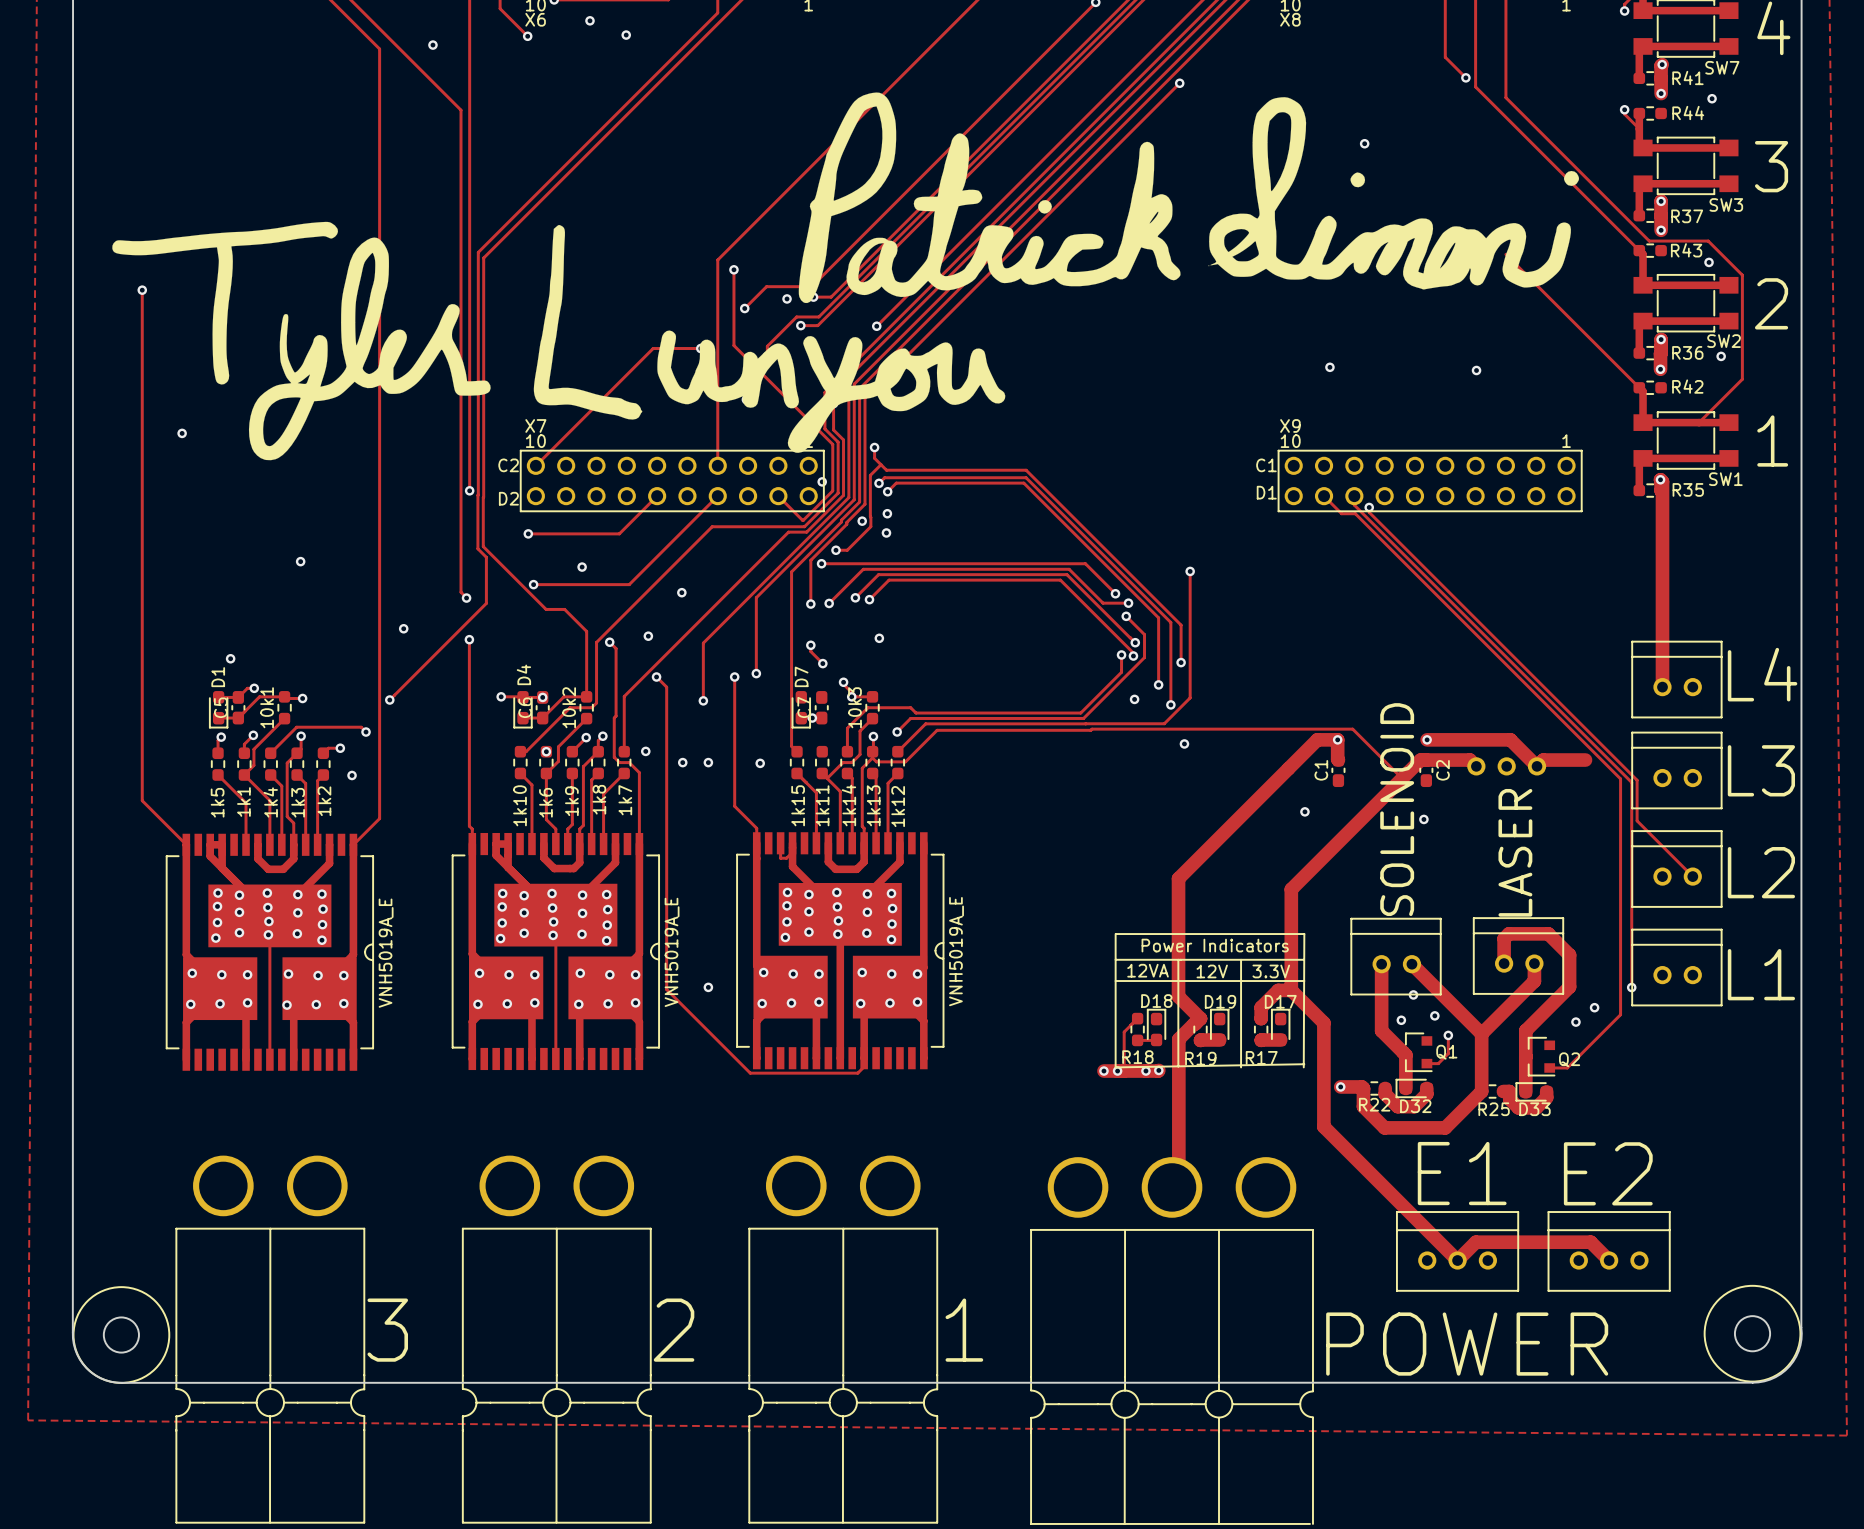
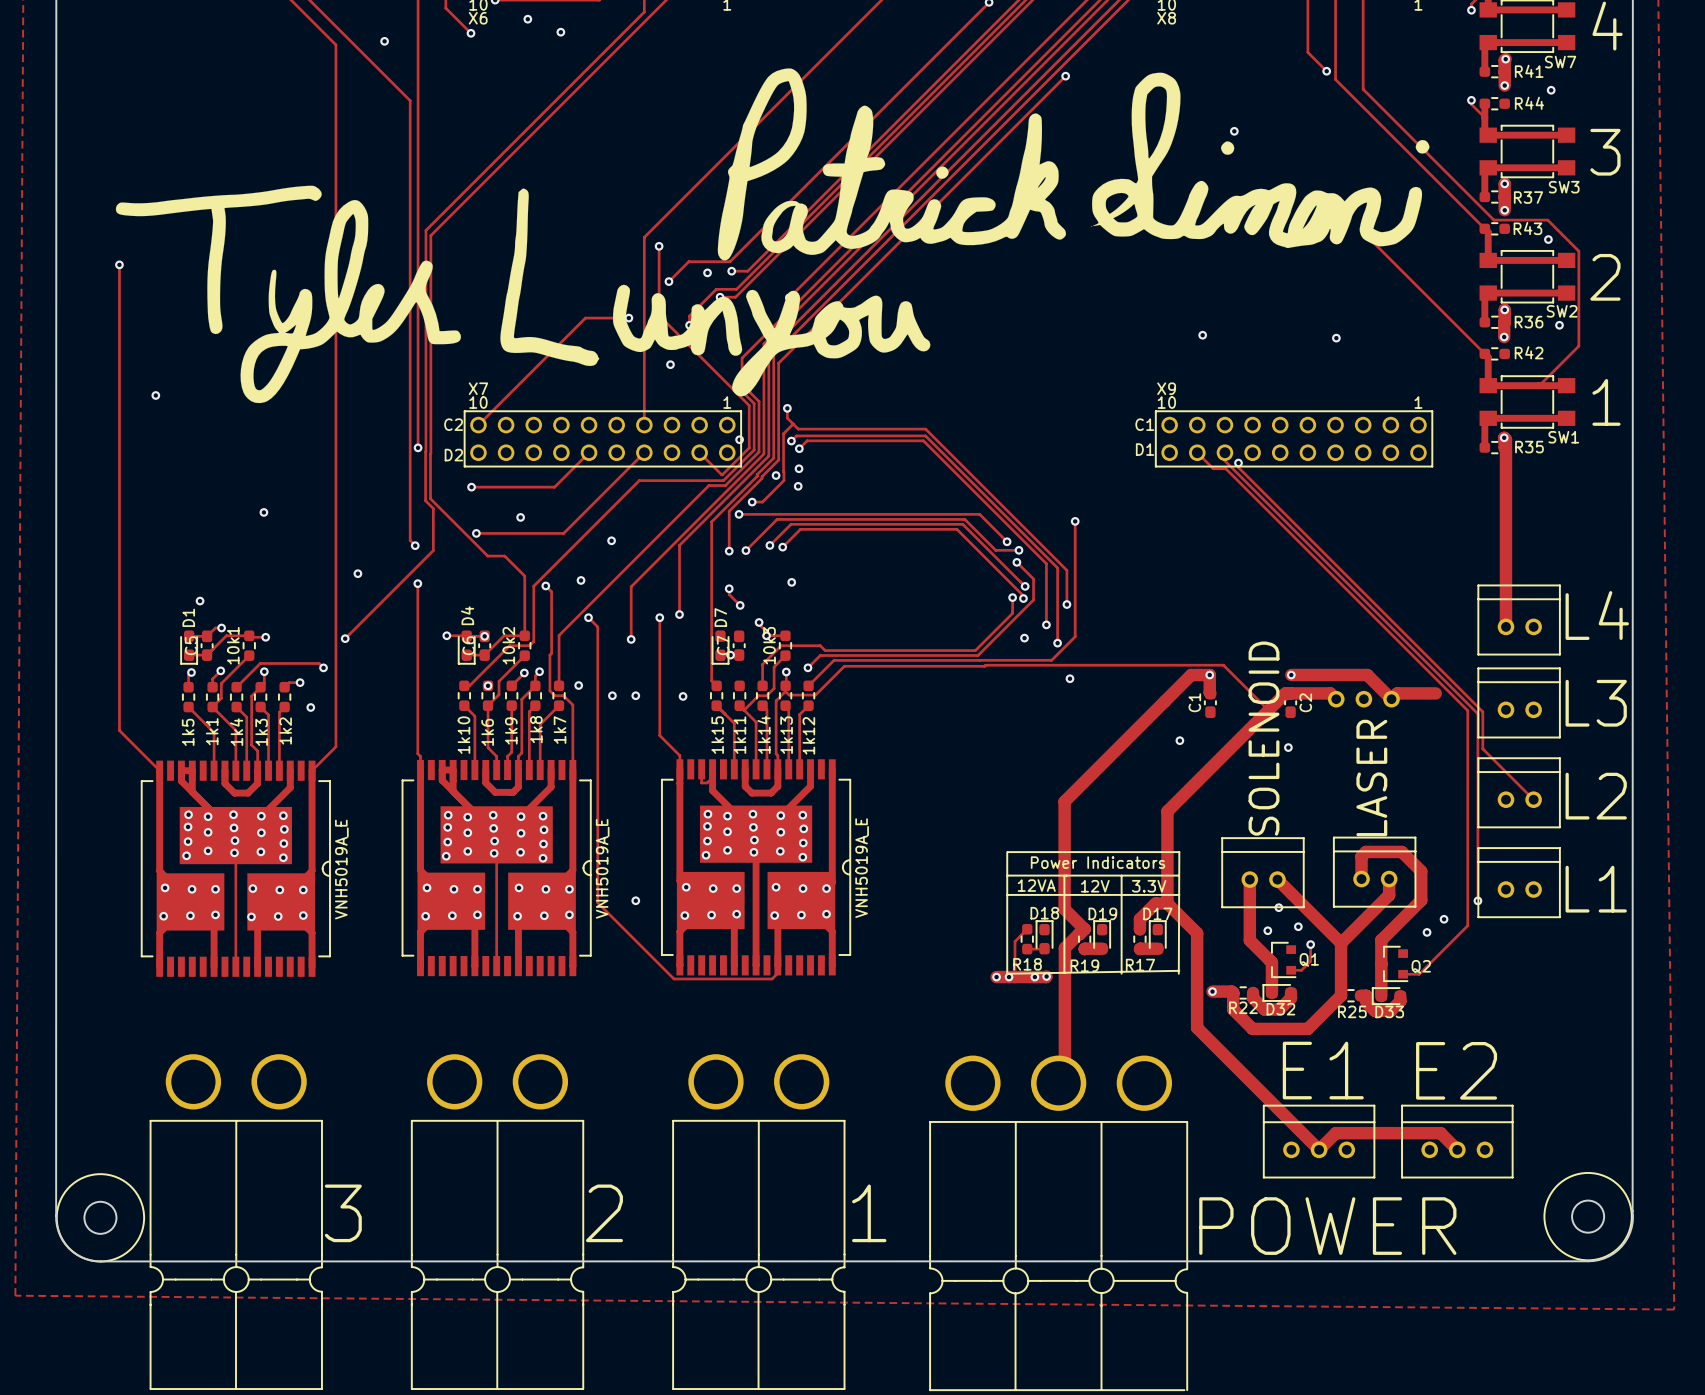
drawing position: (1188, 197) -> (1073, 164)
drawing position: (558, 341) -> (523, 294)

